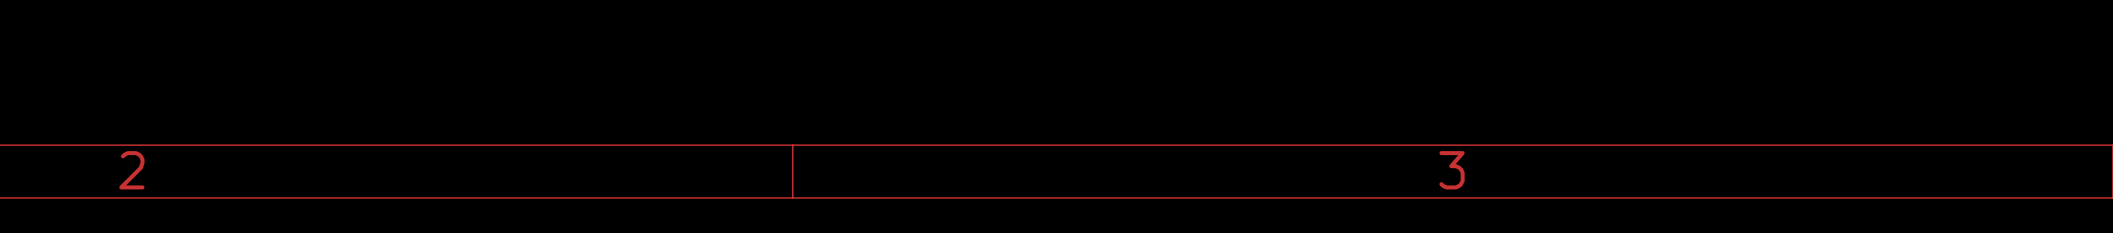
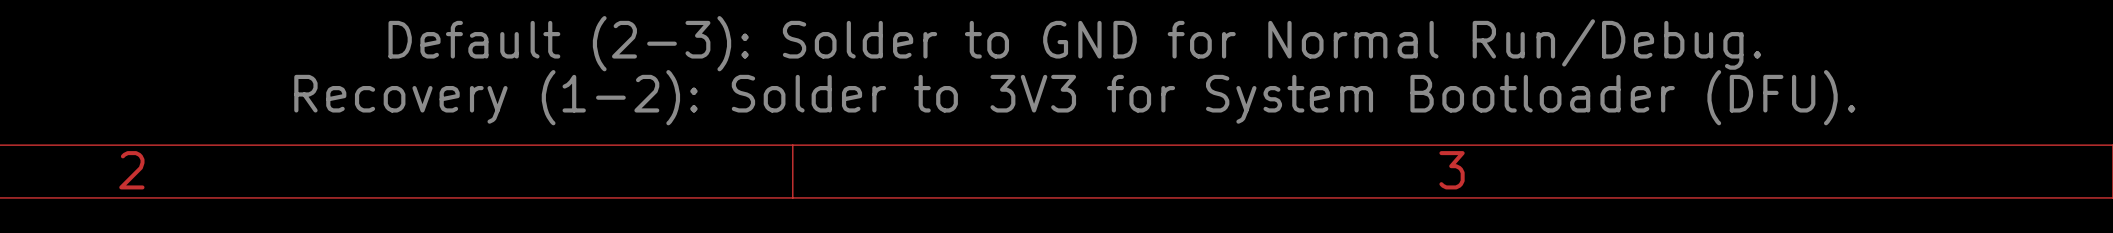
text: none -> Default (2-3): Solder to GND for Normal Run/Debug. (1074, 43)
text: none -> Recovery (1-2): Solder to 3V3 for System Bootloader (DFU). (1074, 97)

